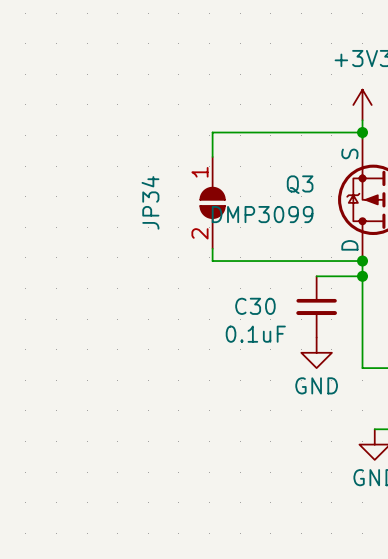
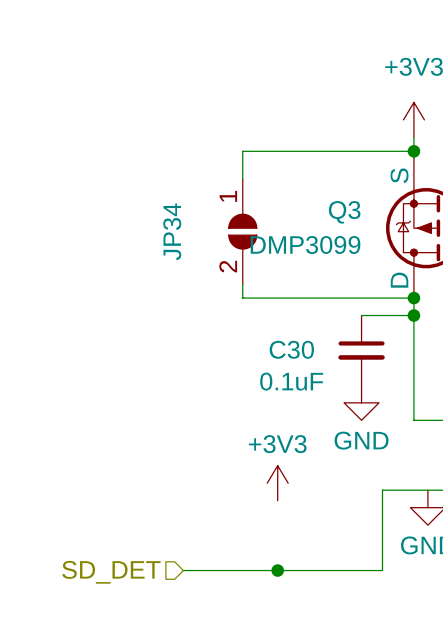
power symbol: none -> +3V3 (277, 483)
wire: none -> (427, 490) (382, 490) (382, 570) (183, 570)
hierarchical label: none -> SD_DET (111, 572)
junction: none -> (277, 570)

